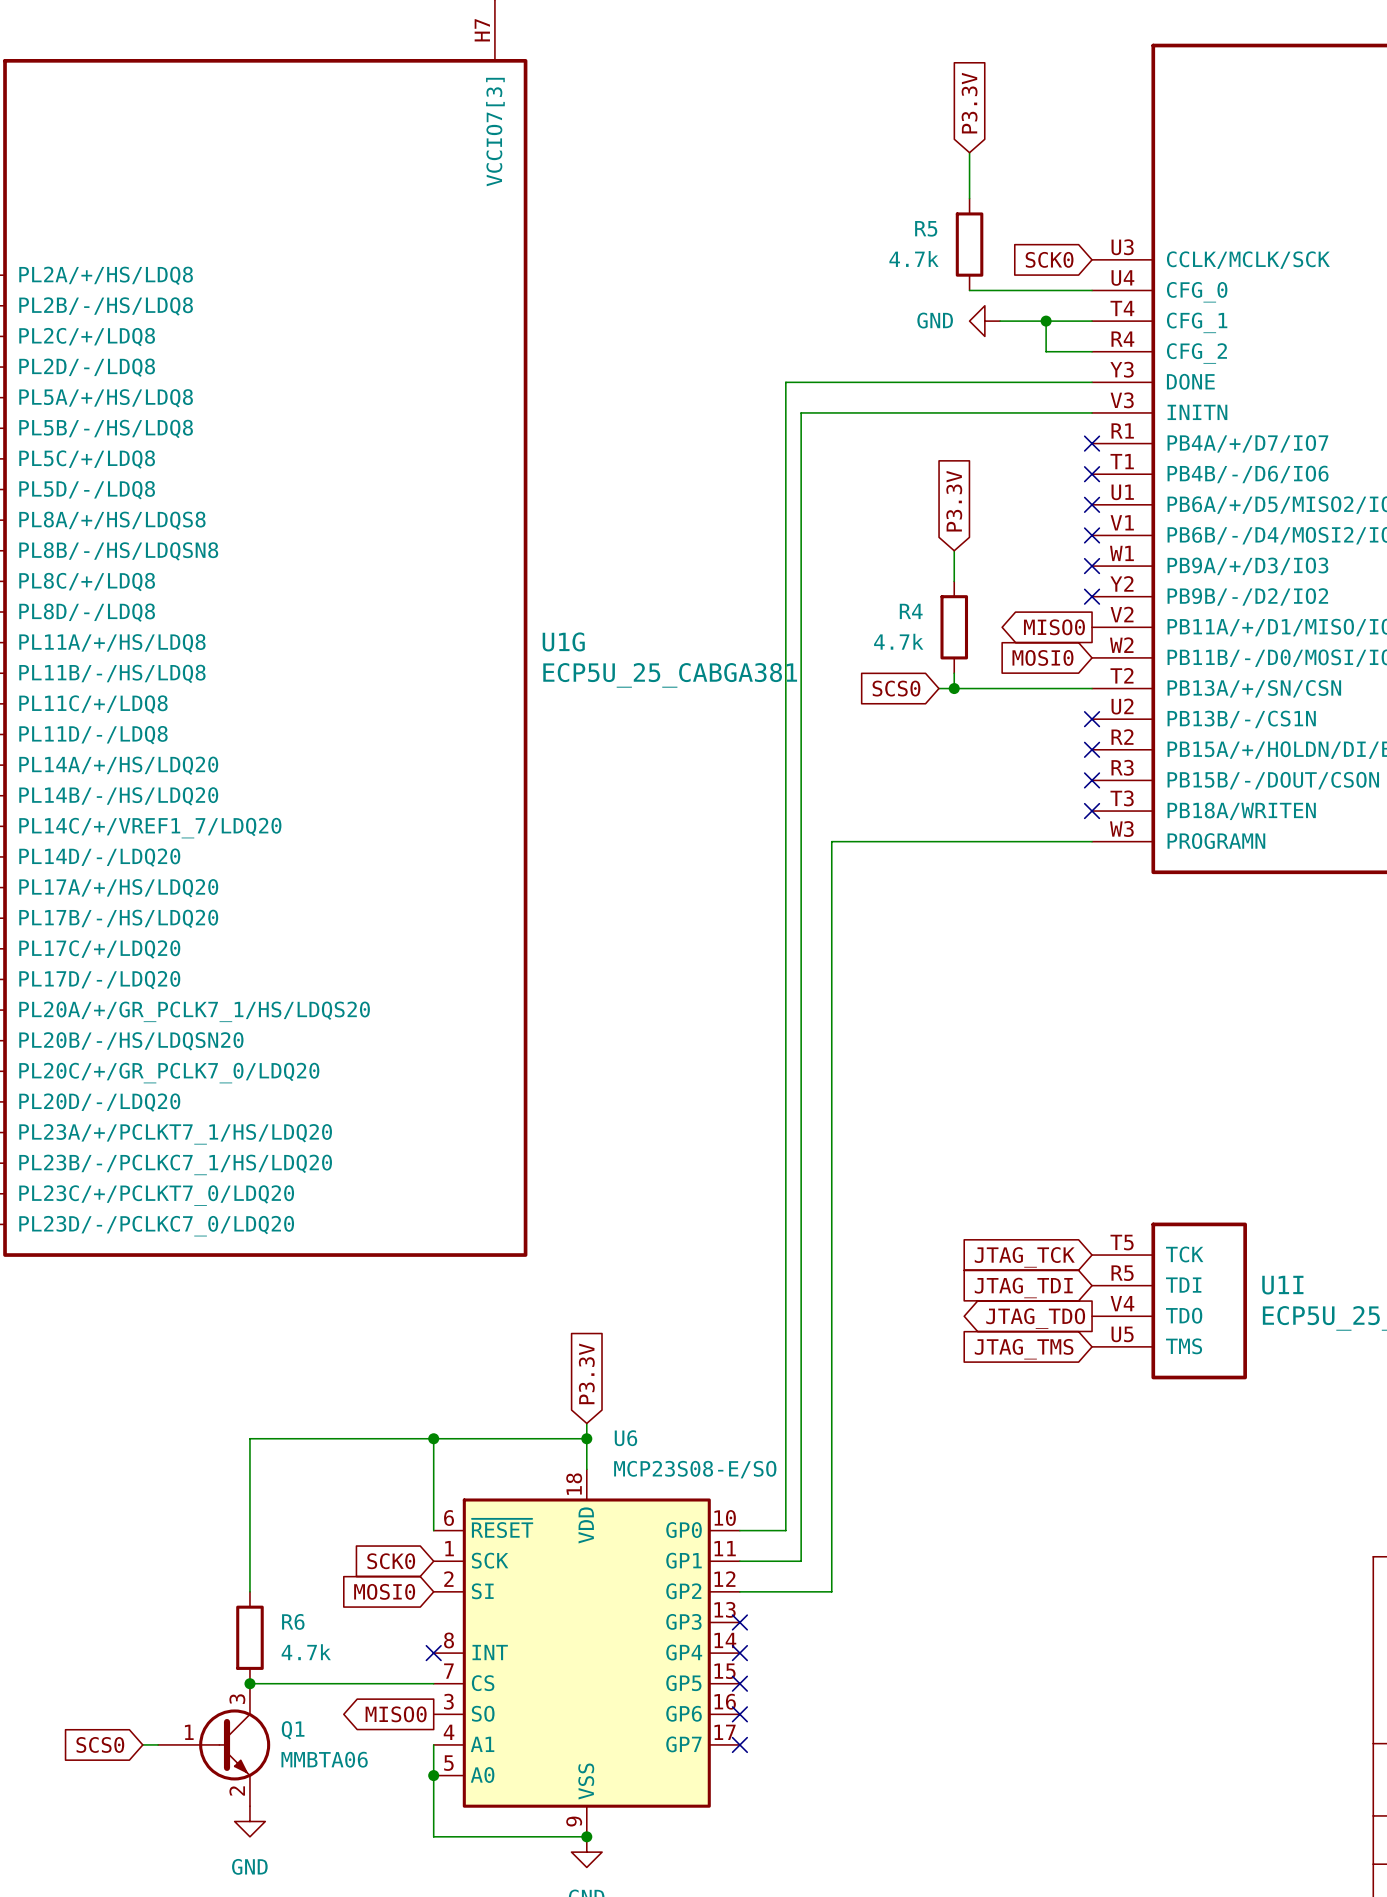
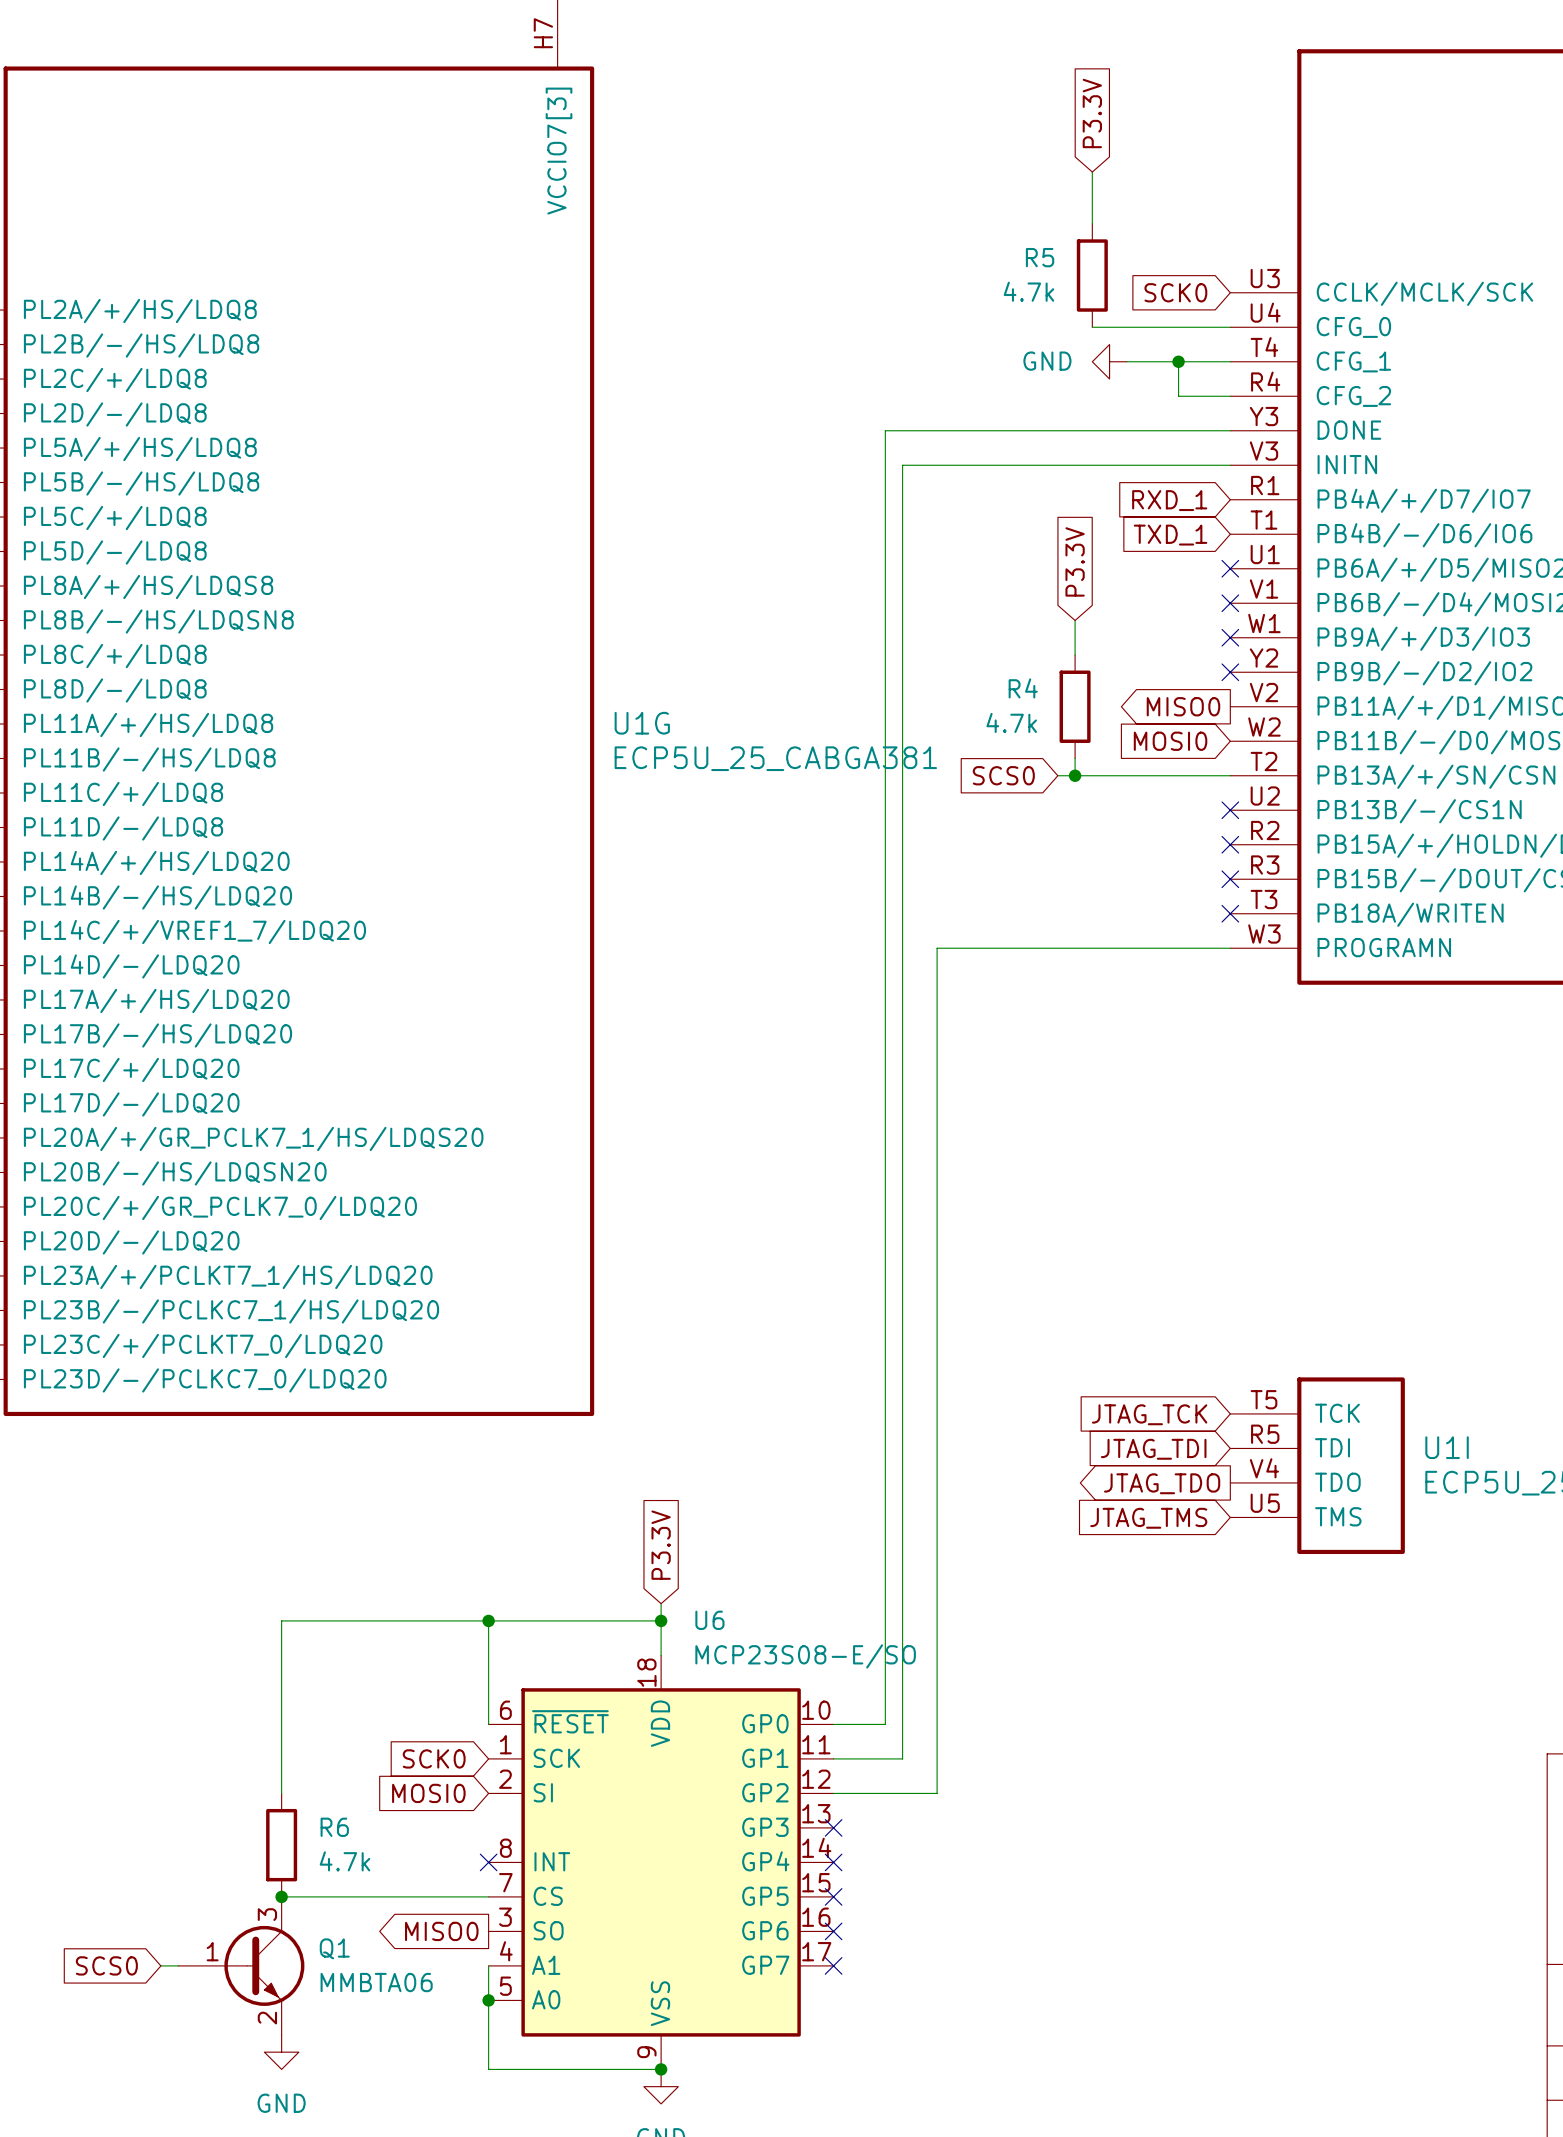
no-connect mark: (1092, 443) -> none
global label: none -> RXD_1 (1169, 500)
no-connect mark: (1092, 474) -> none
global label: none -> TXD_1 (1170, 535)

